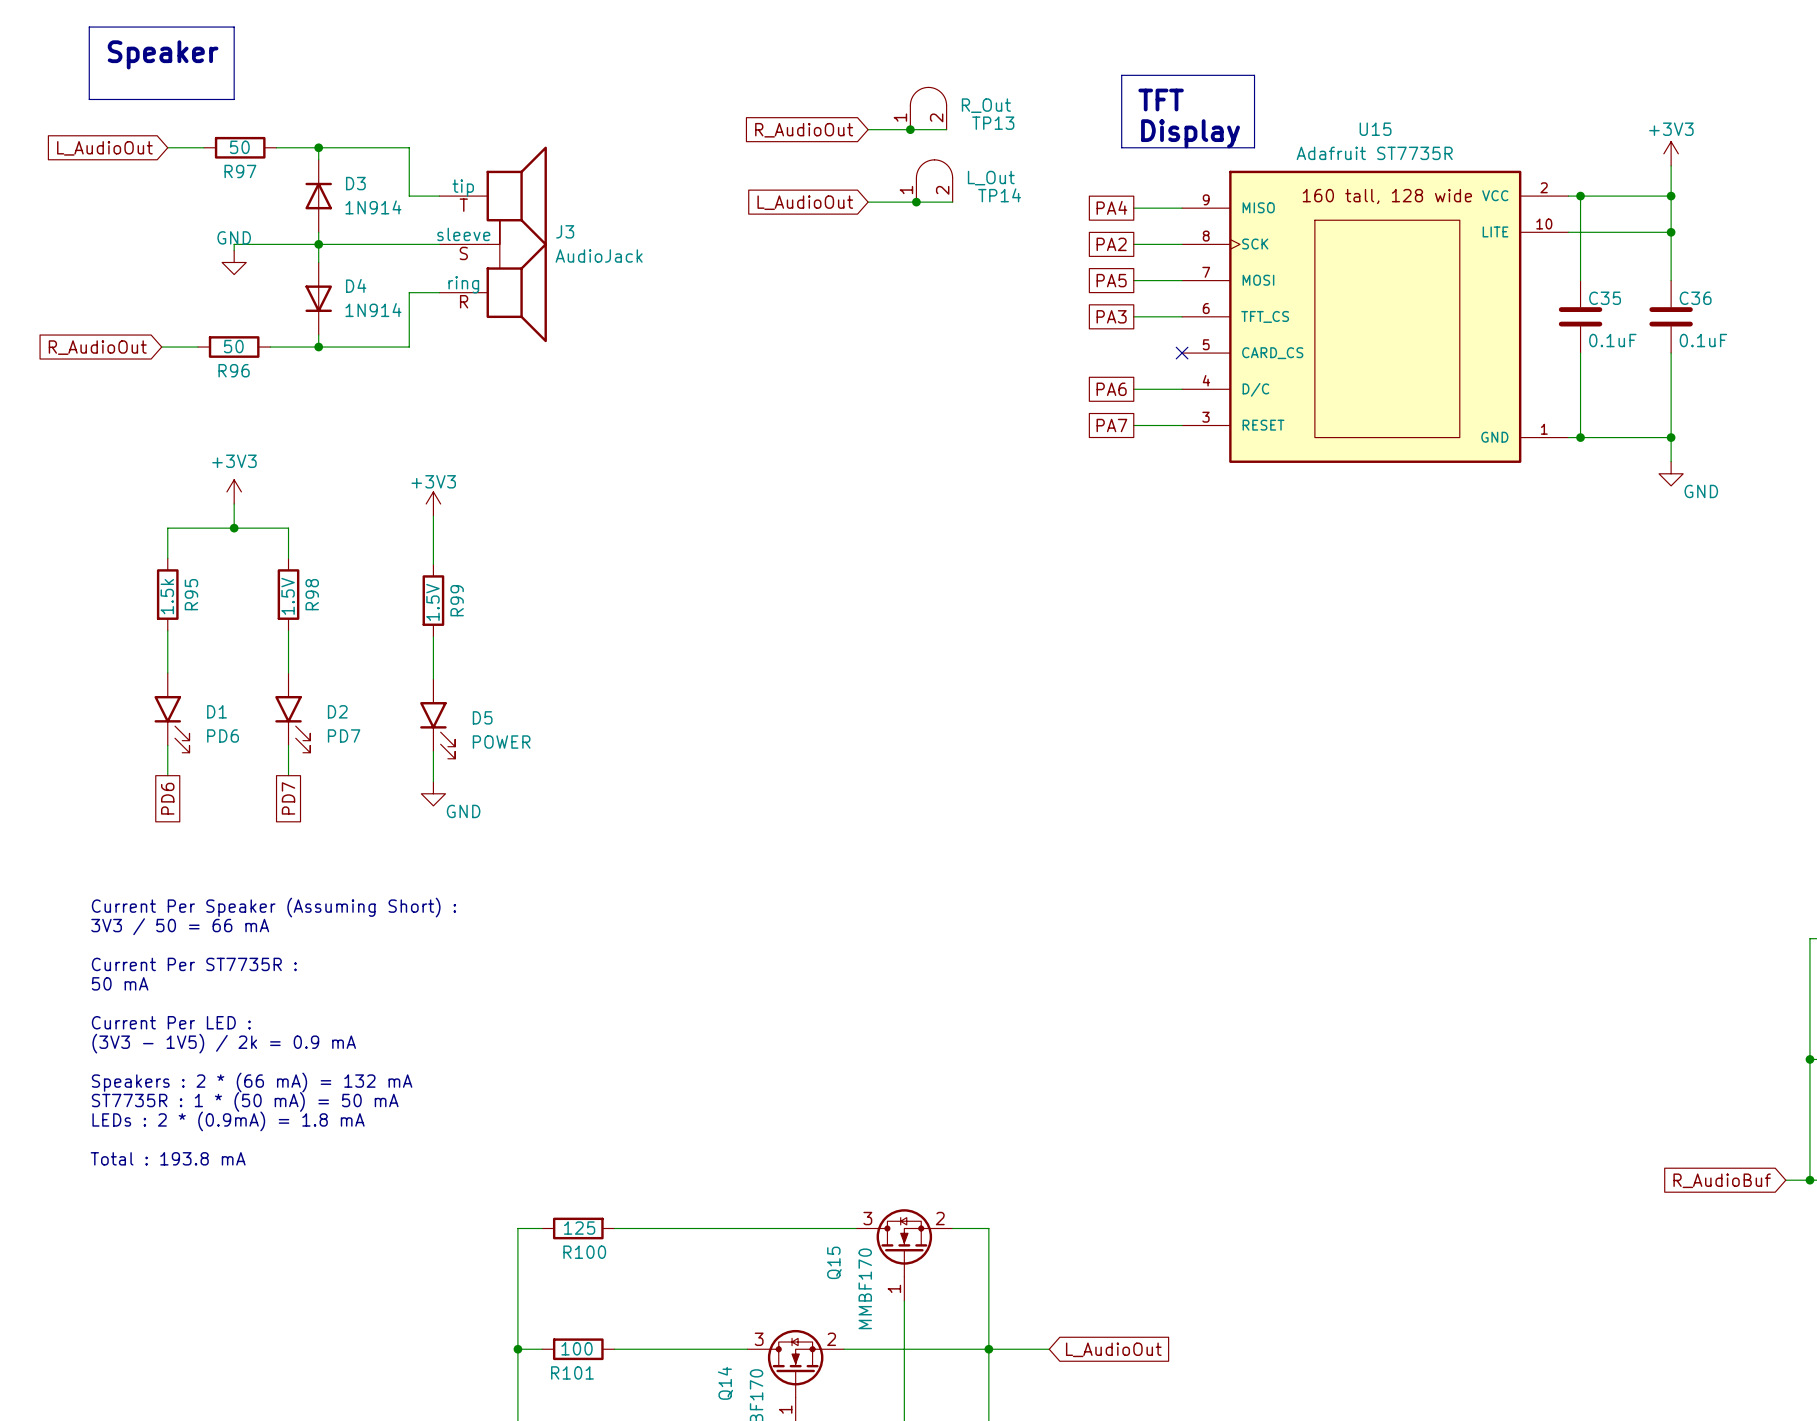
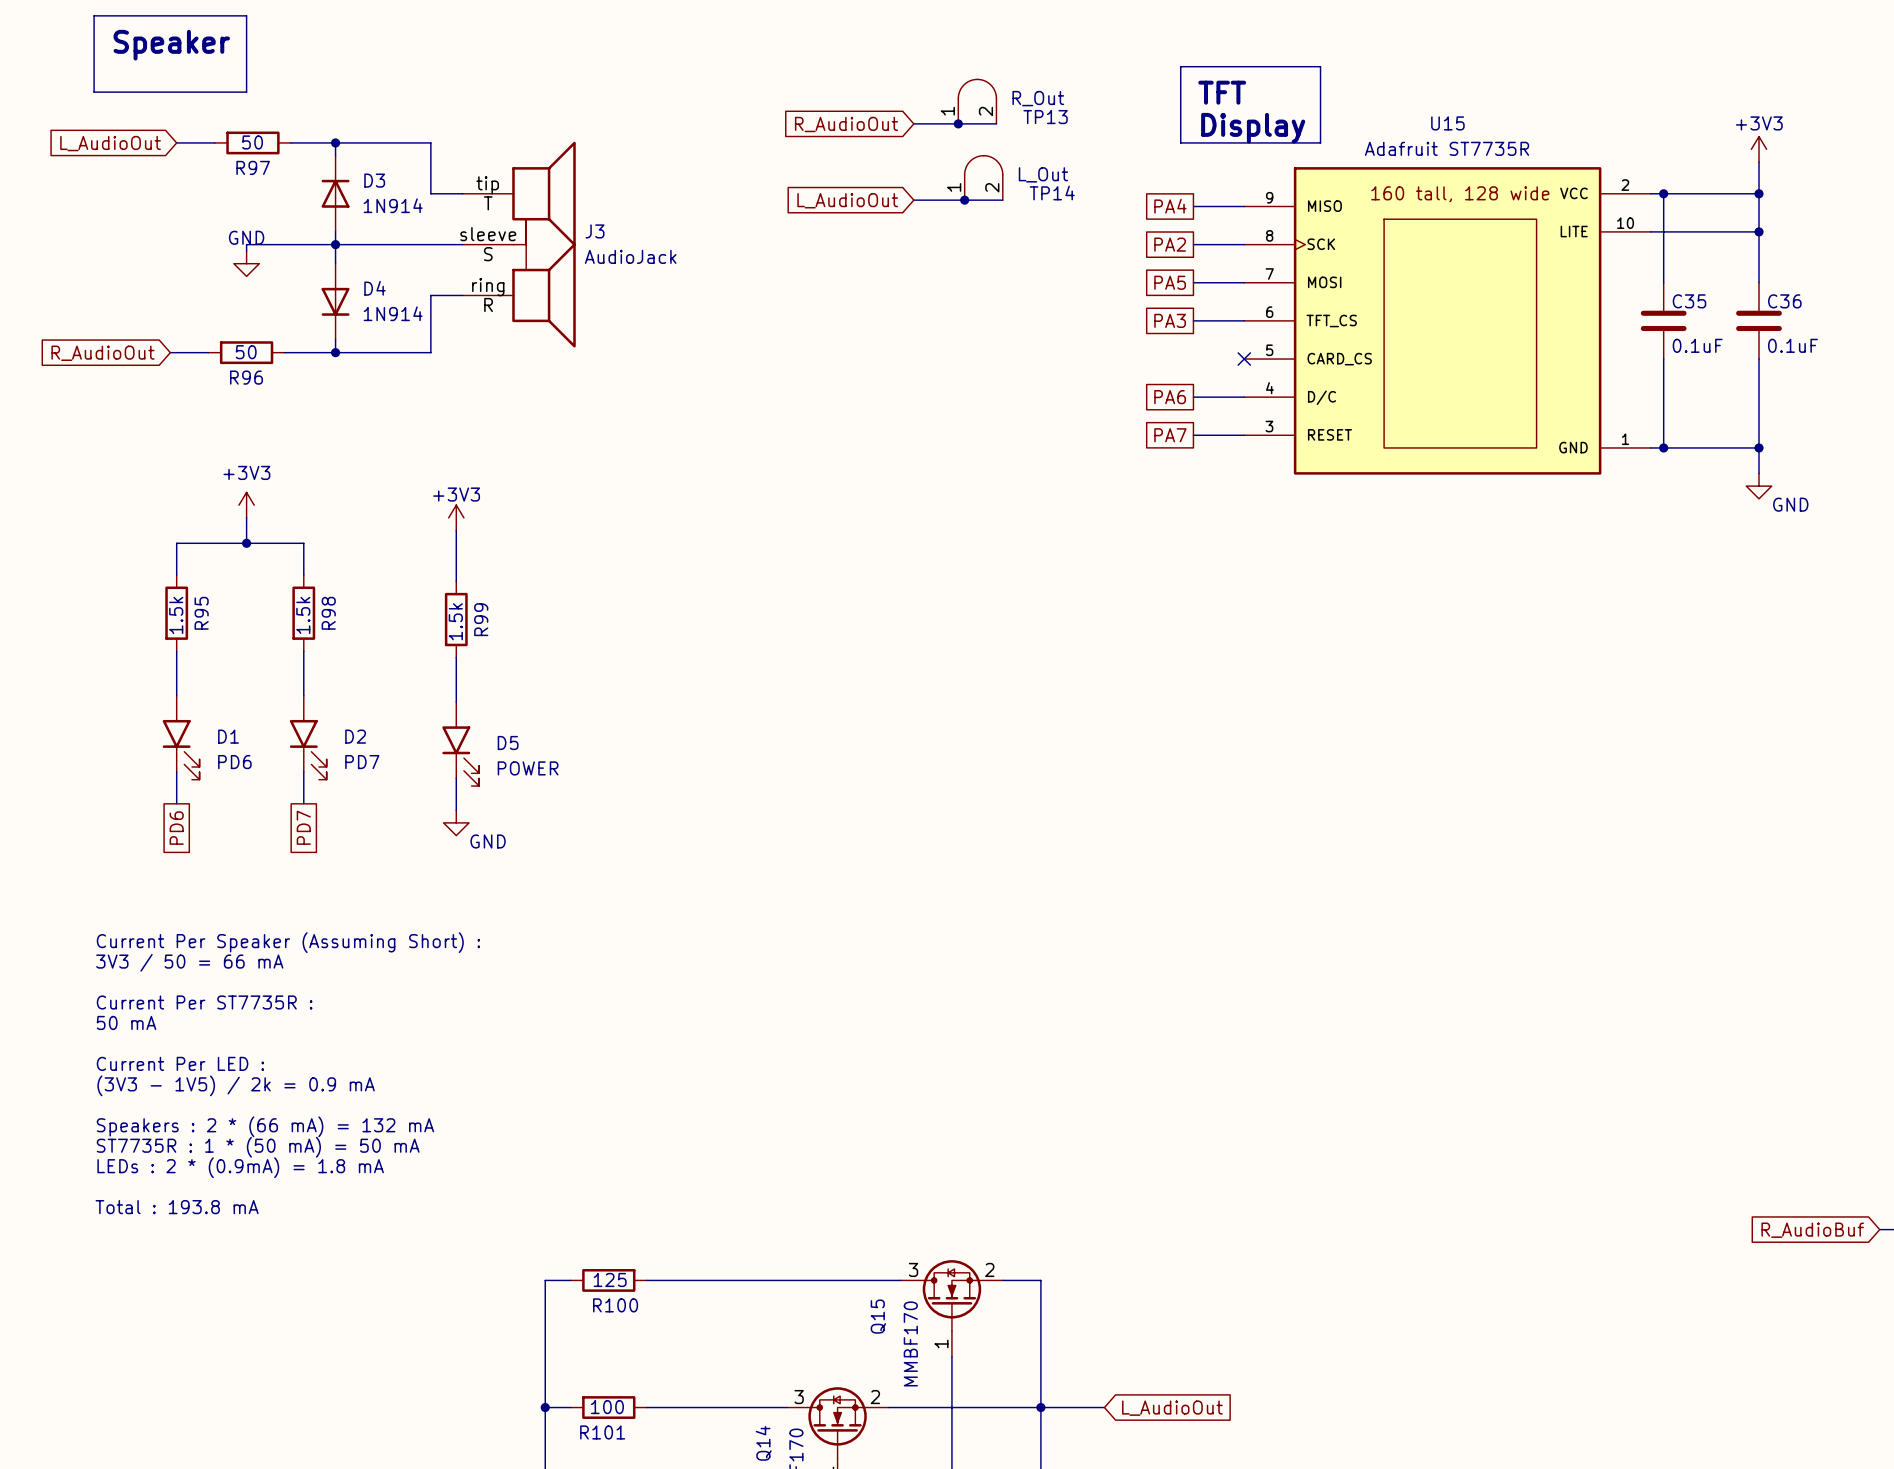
R98 value: 1.5V (288, 596) -> 1.5k (303, 615)
R99 value: 1.5V (432, 602) -> 1.5k (455, 621)

